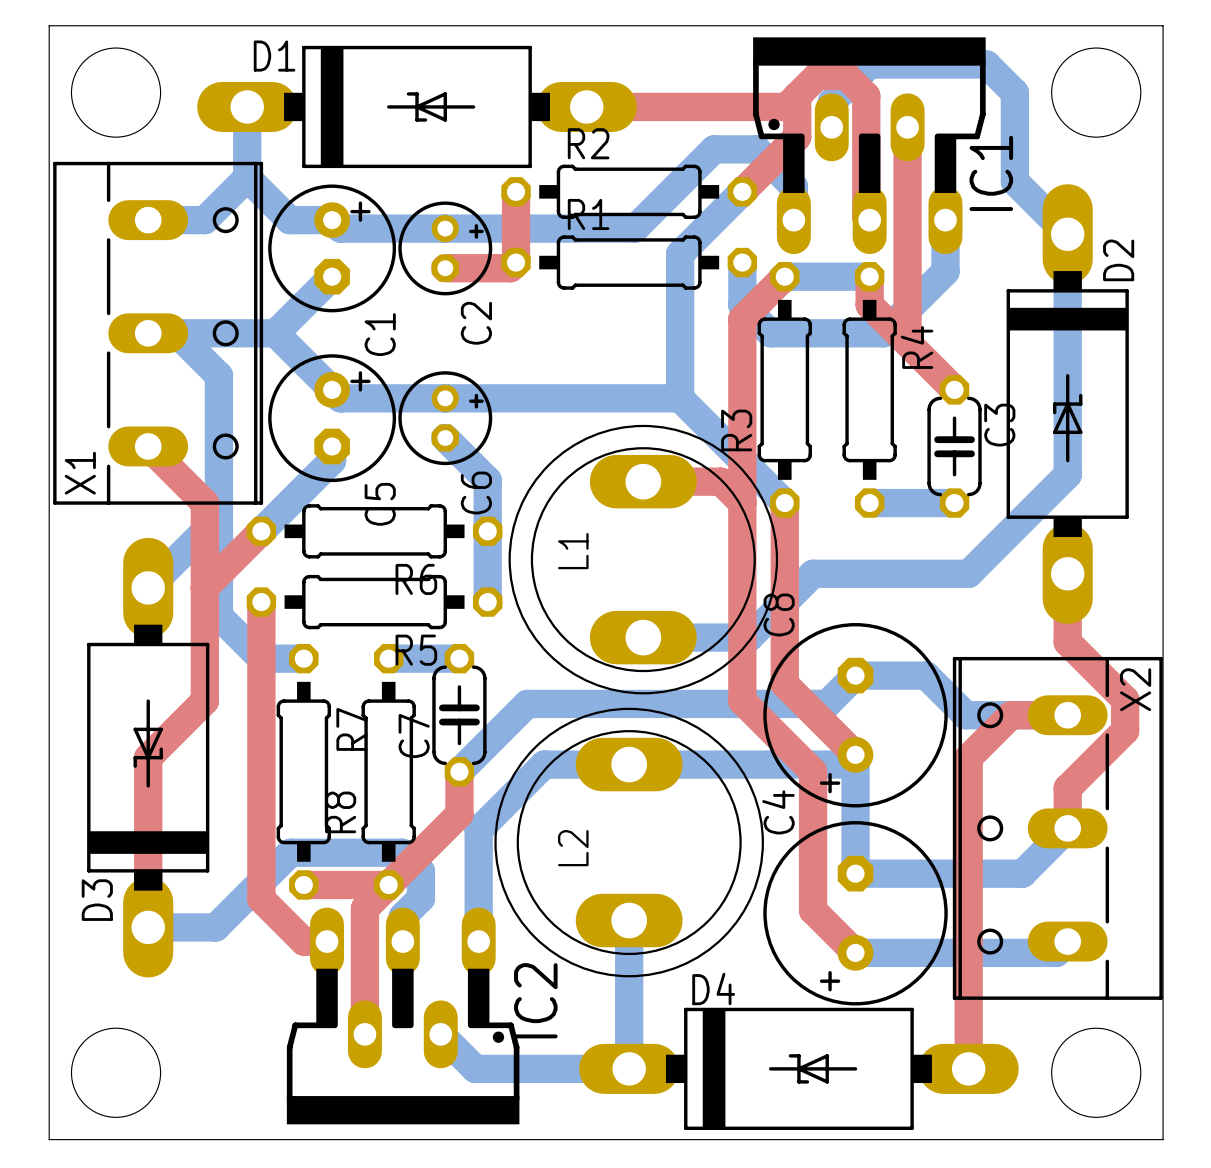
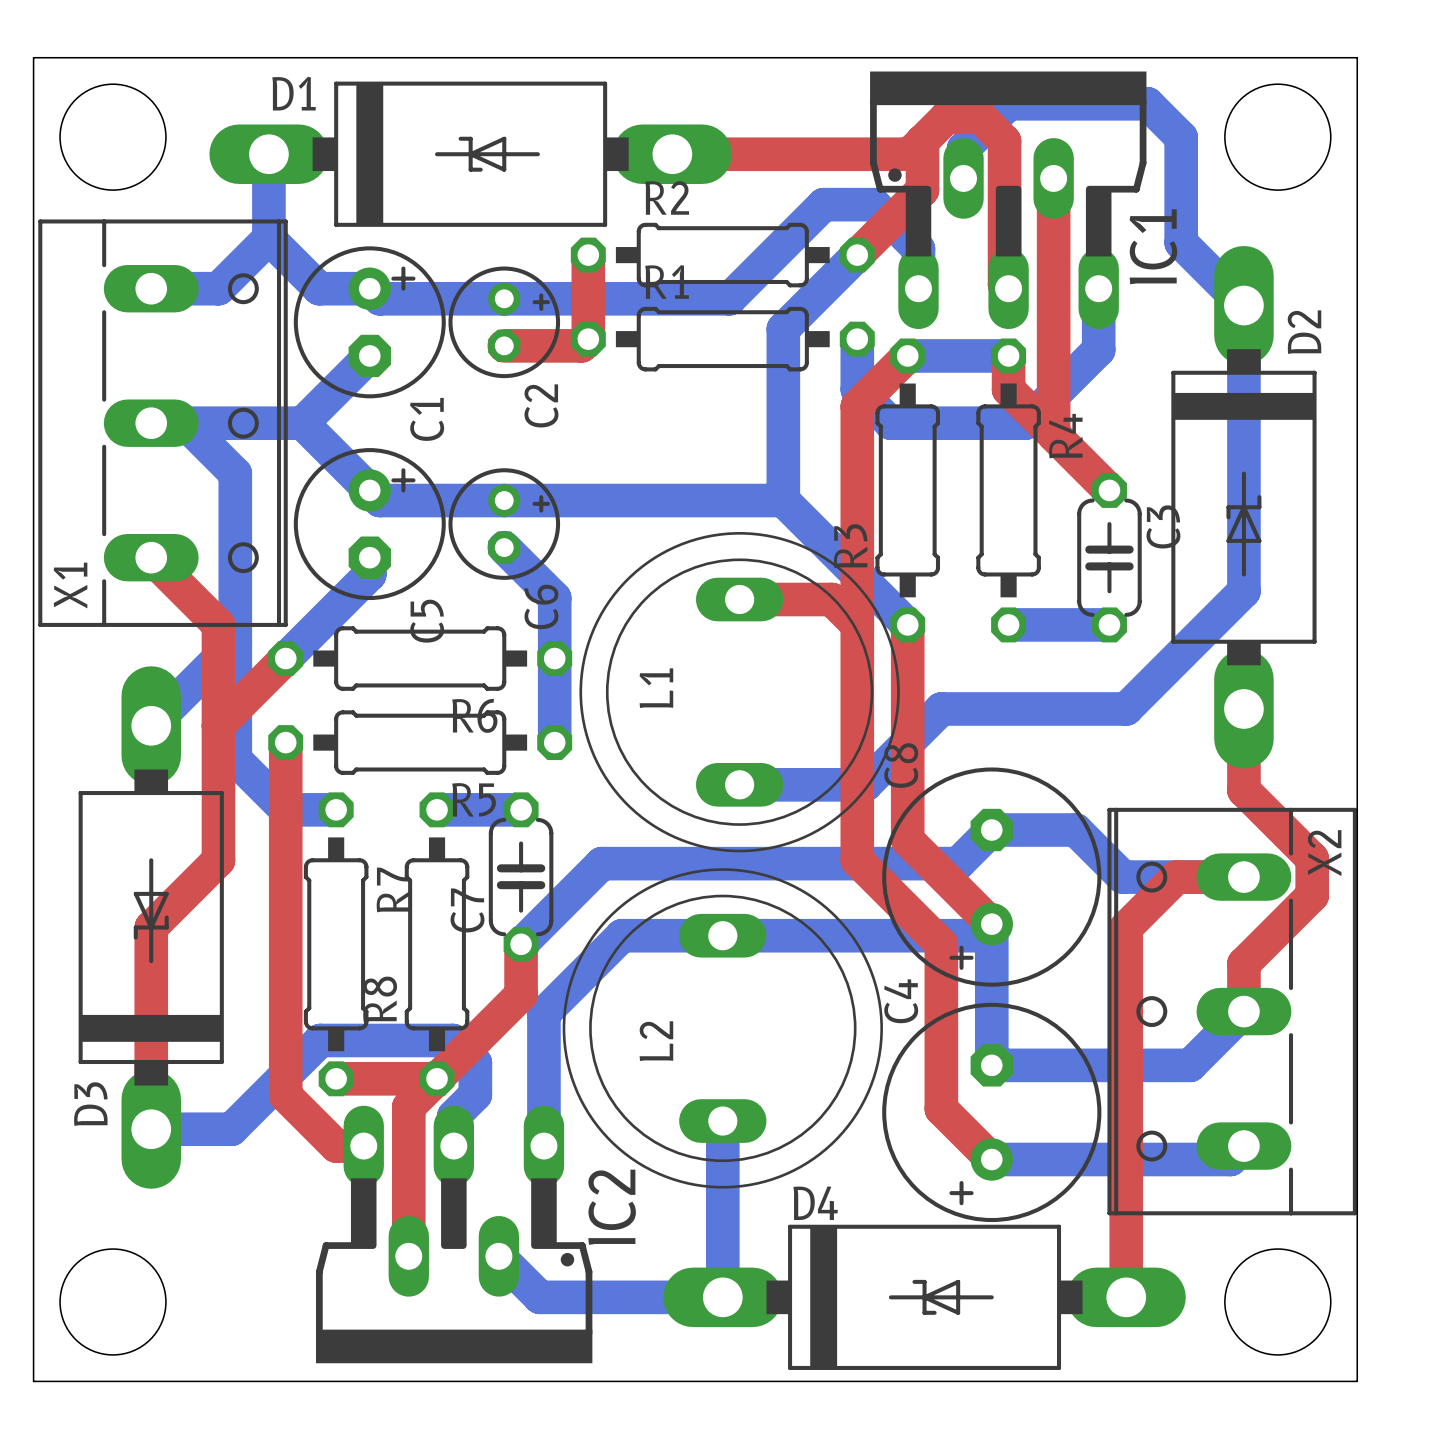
L1 footprint: [508, 424, 779, 695] -> [579, 532, 900, 853]
L2 footprint: [494, 707, 764, 978] -> [562, 868, 883, 1189]

